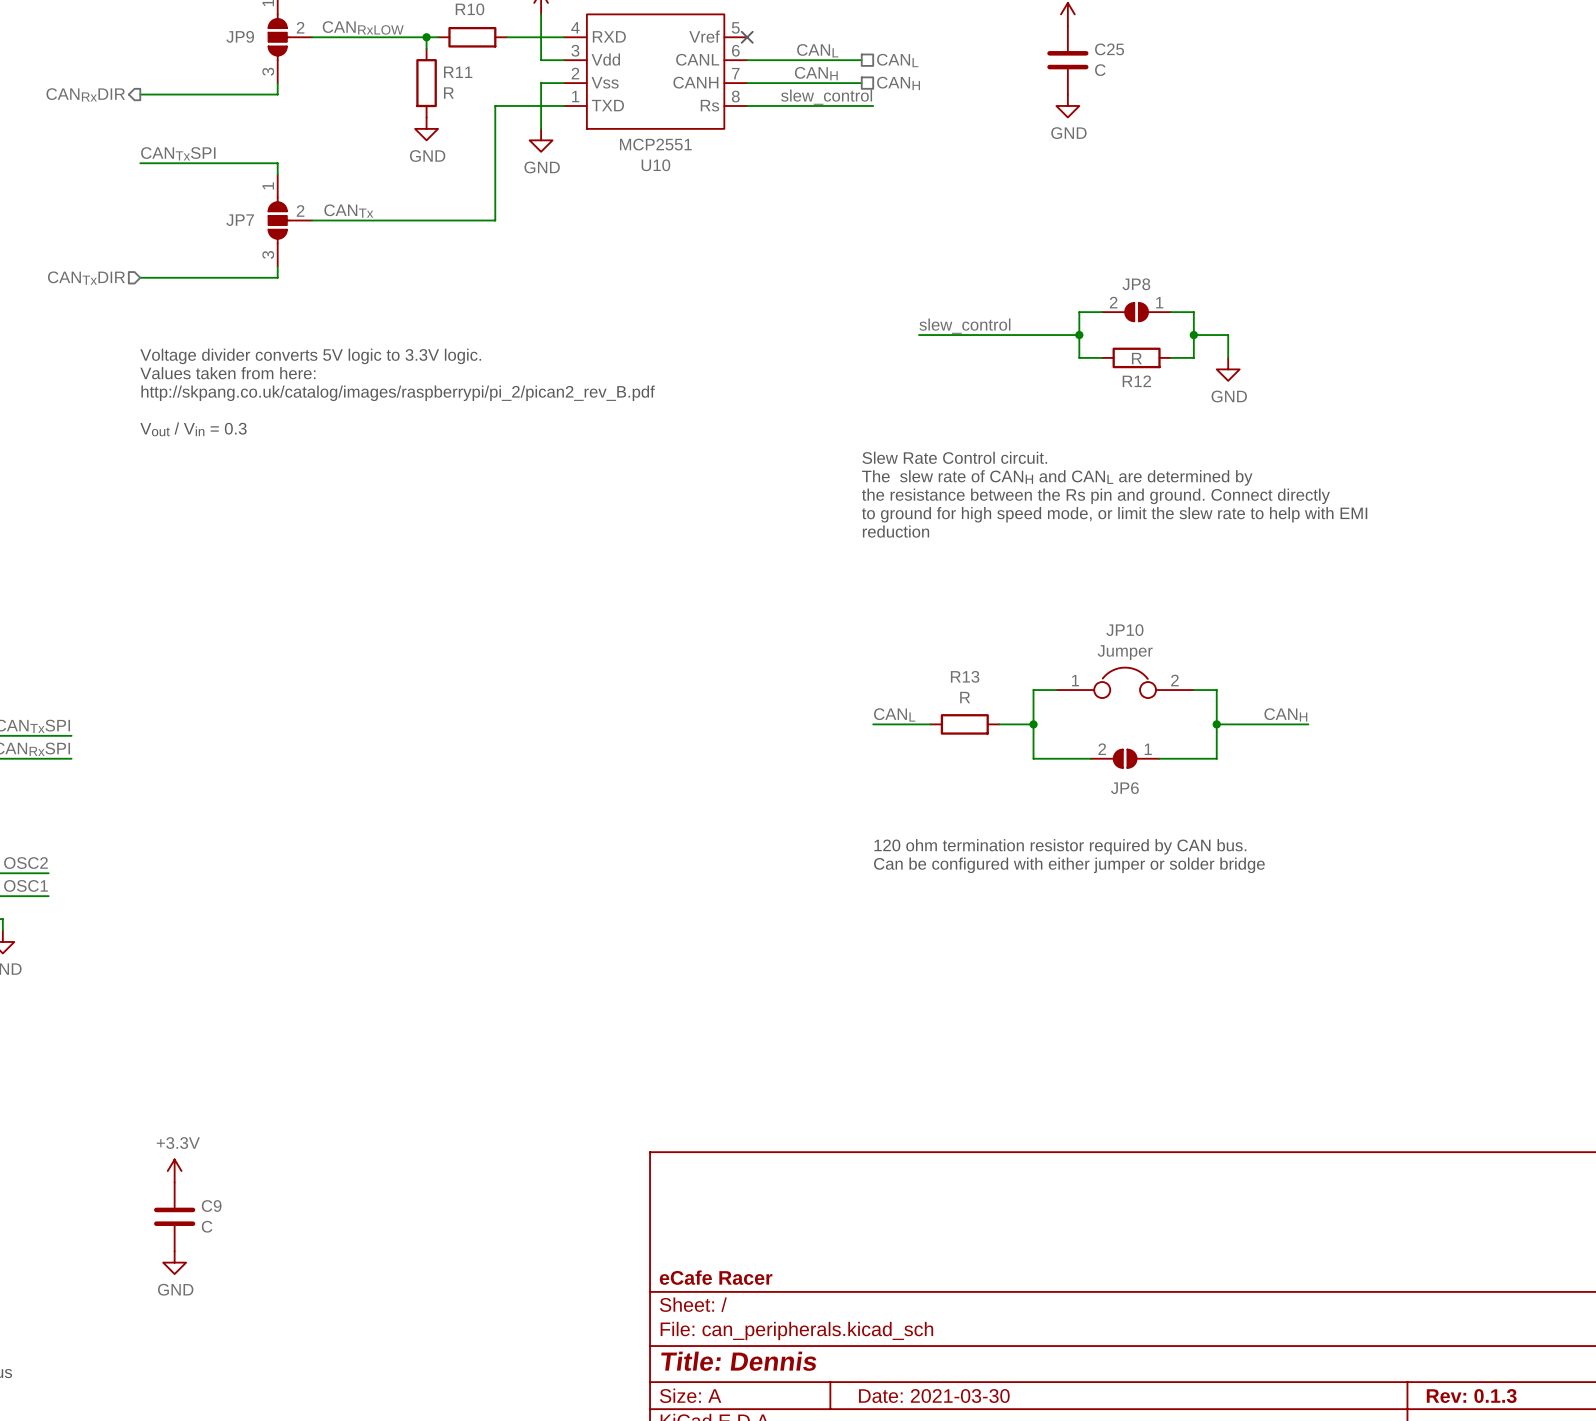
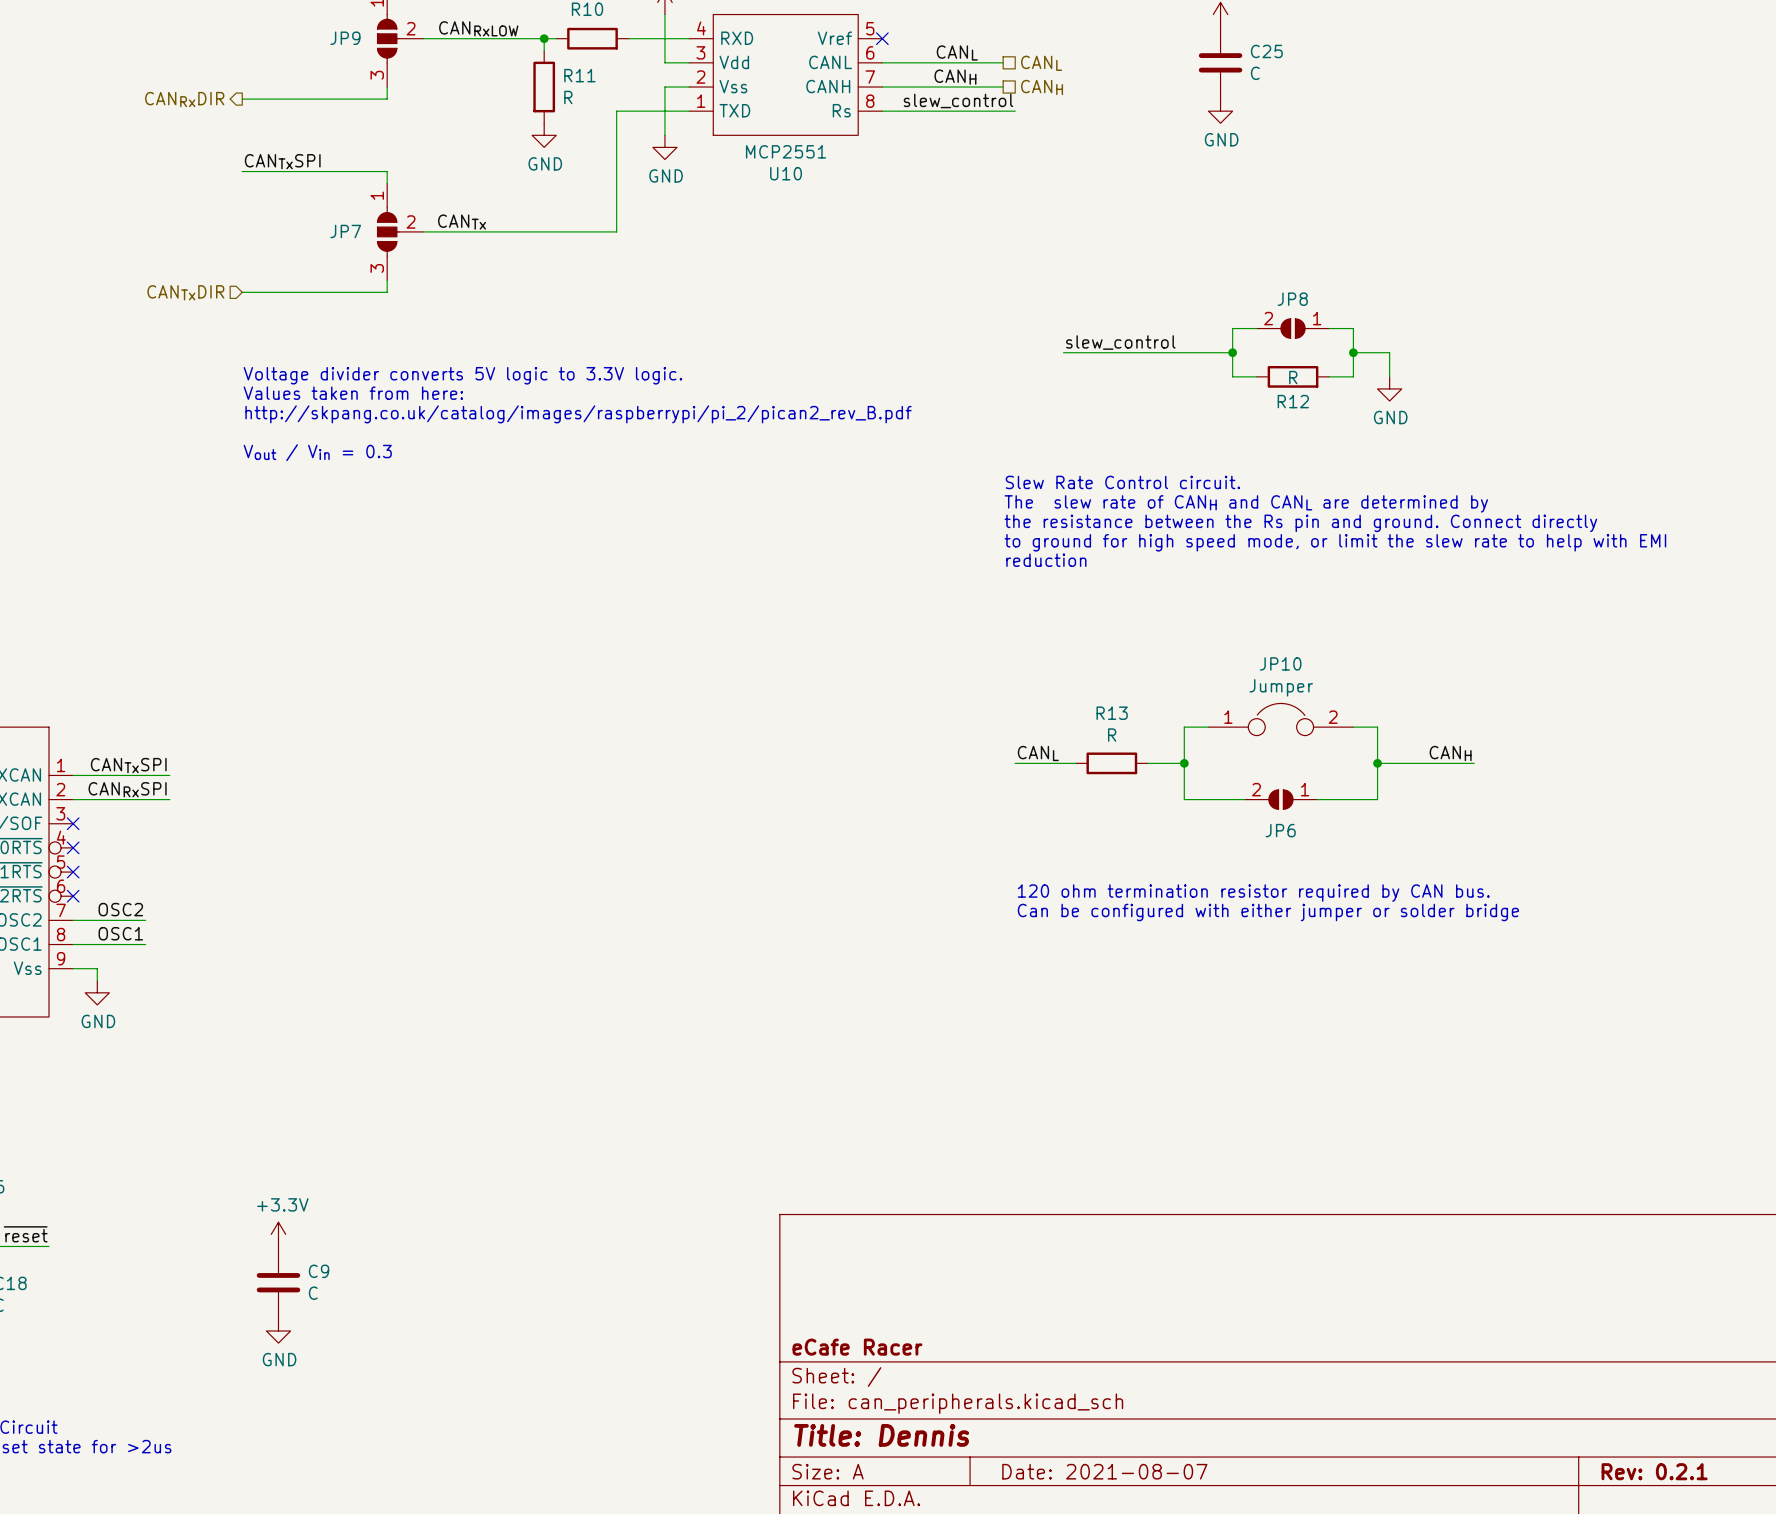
title block: Date: 2021-03-30 (934, 1396) -> Date: 2021-08-07 (1104, 1471)
title block: Rev: 0.1.3 (1471, 1396) -> Rev: 0.2.1 (1654, 1471)

